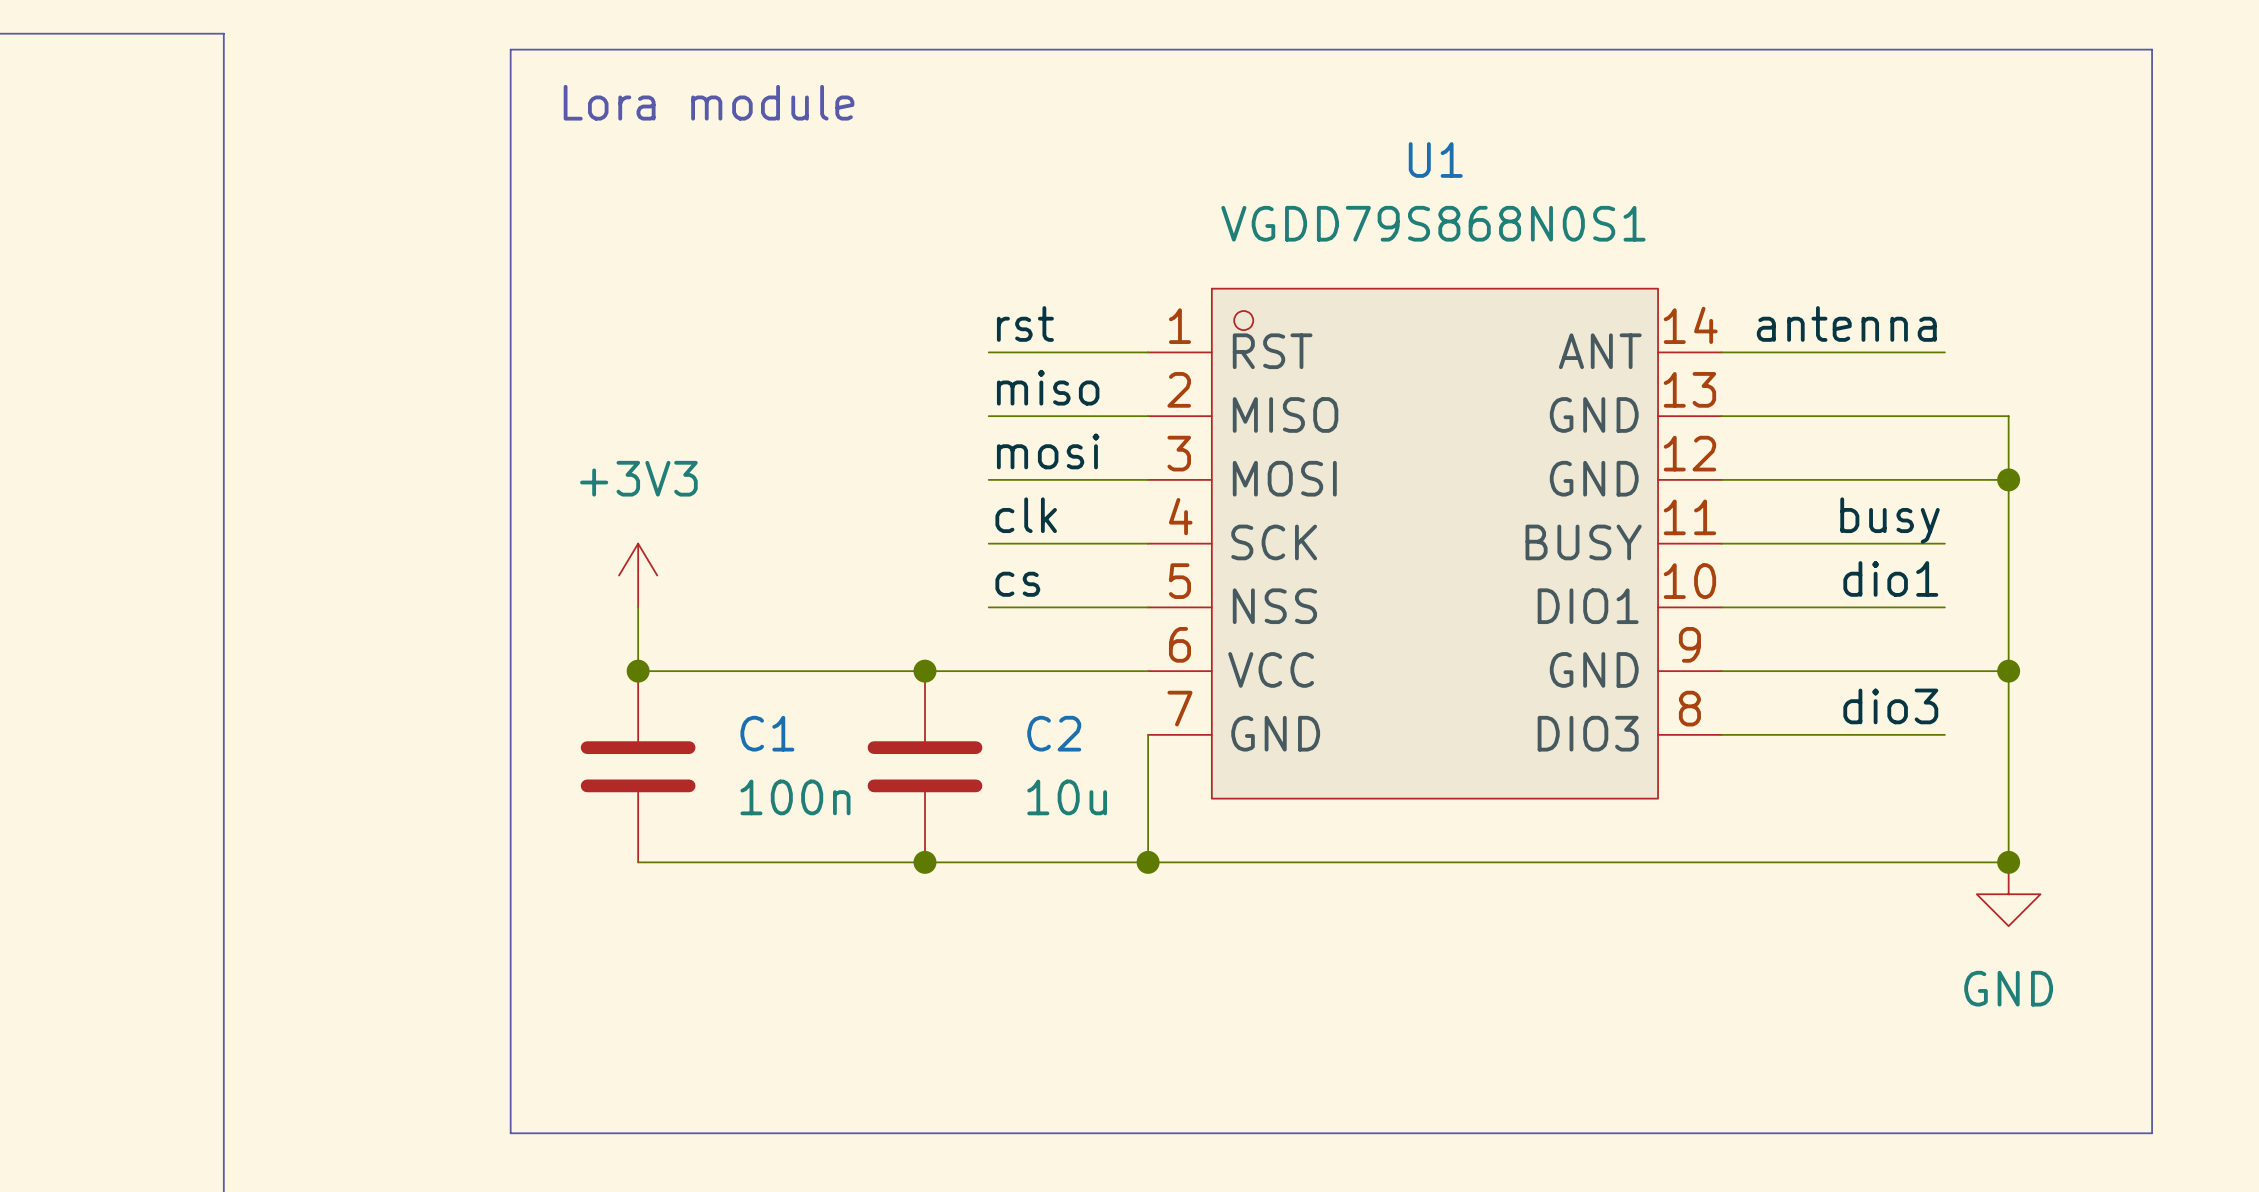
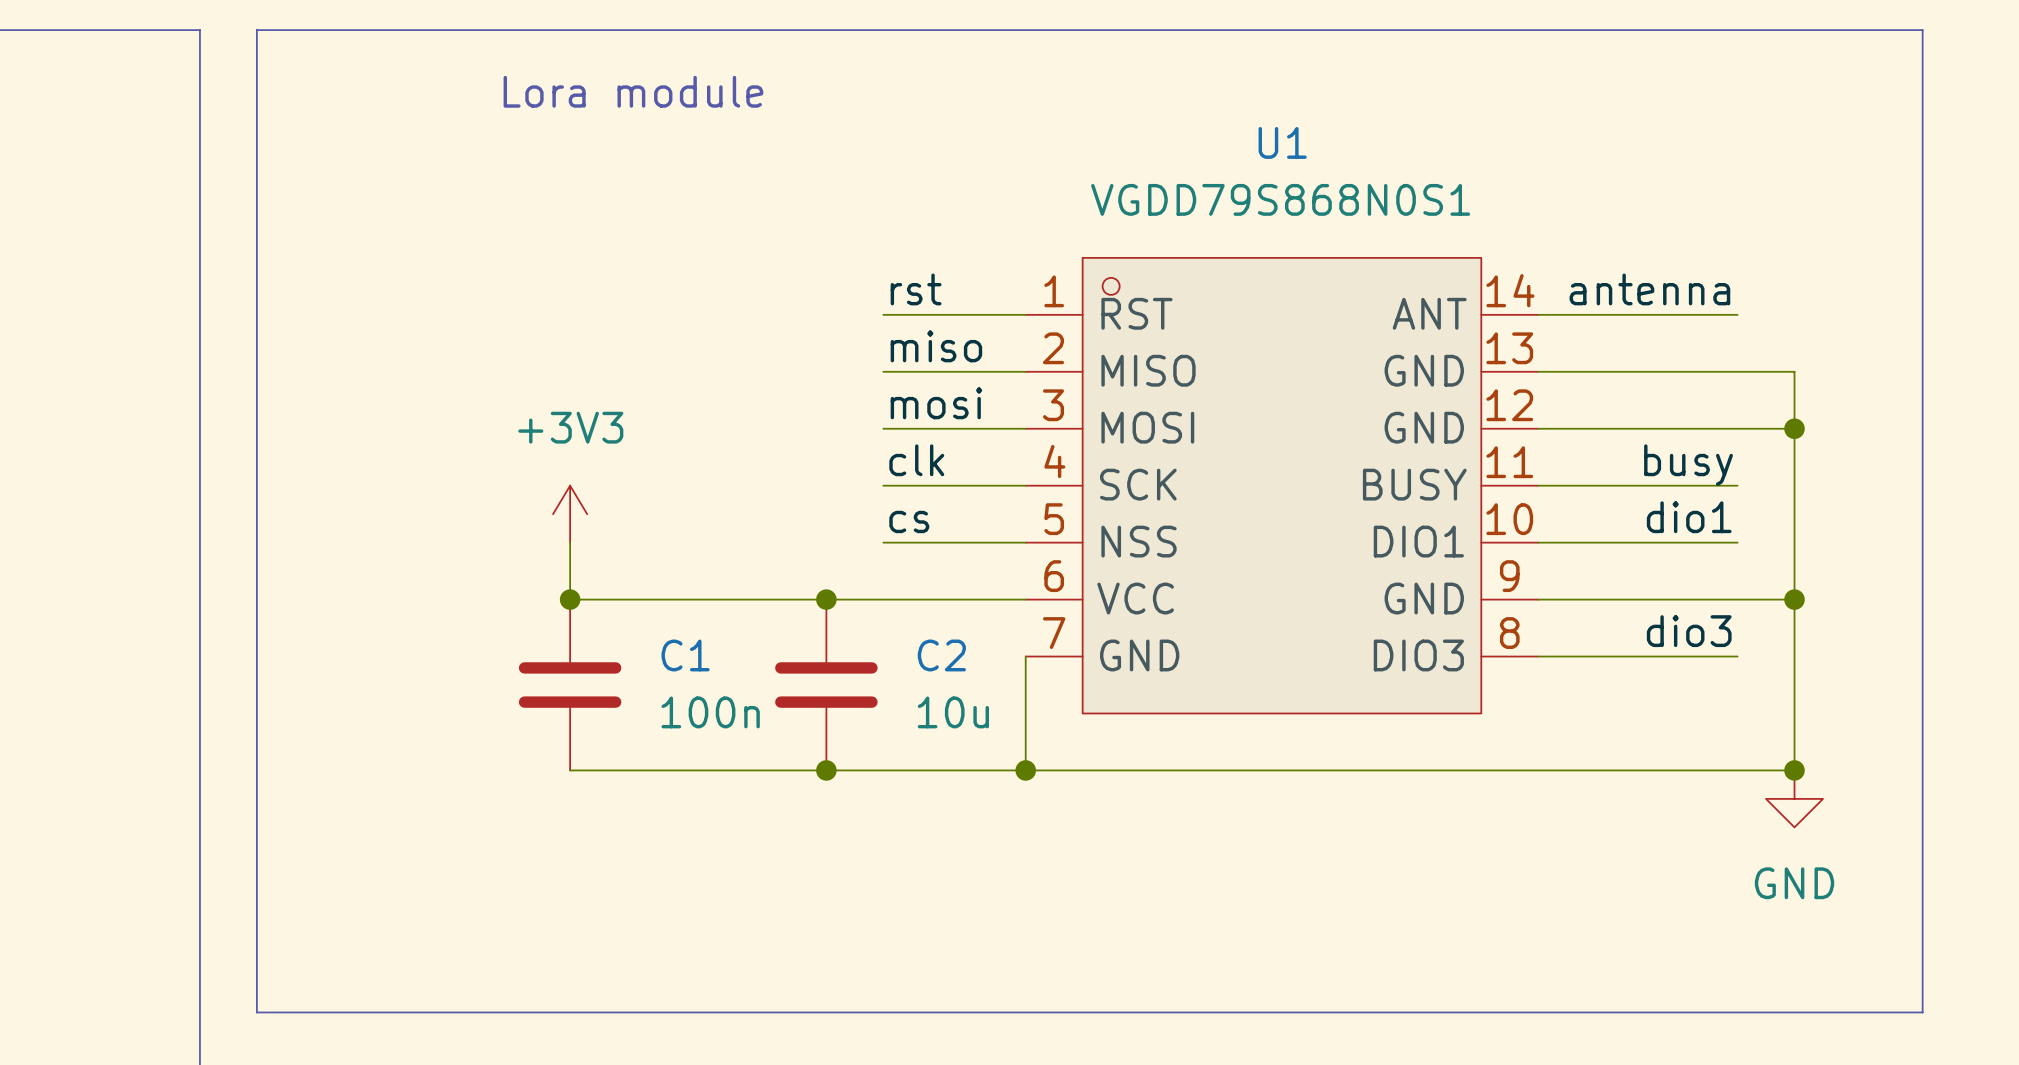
line: (2152, 49) (510, 49) (510, 1133) -> (1922, 44) (1922, 30) (256, 30) (256, 1012) (456, 1012)

